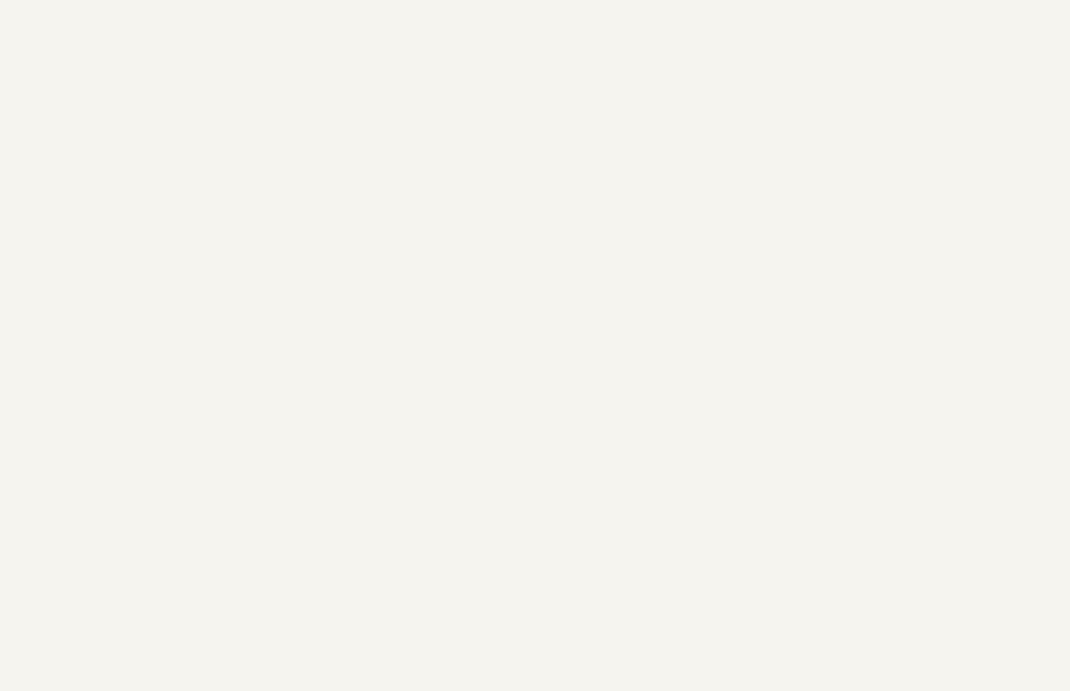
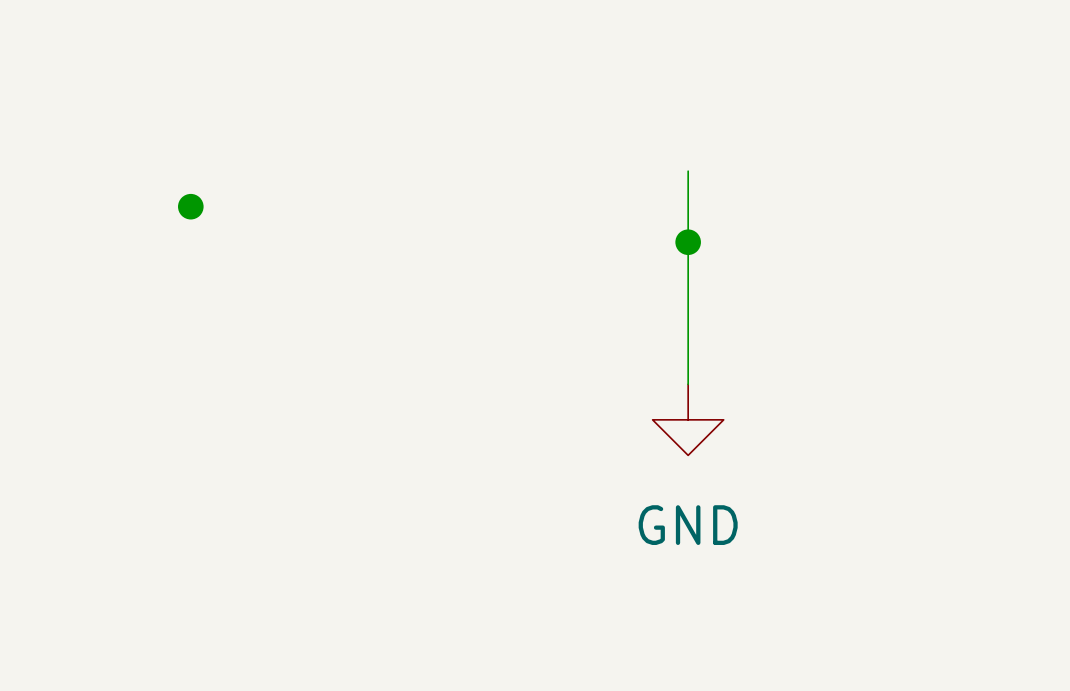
wire: none -> (688, 171) (688, 384)
junction: none -> (190, 206)
junction: none -> (688, 242)
power symbol: none -> GND (688, 419)

